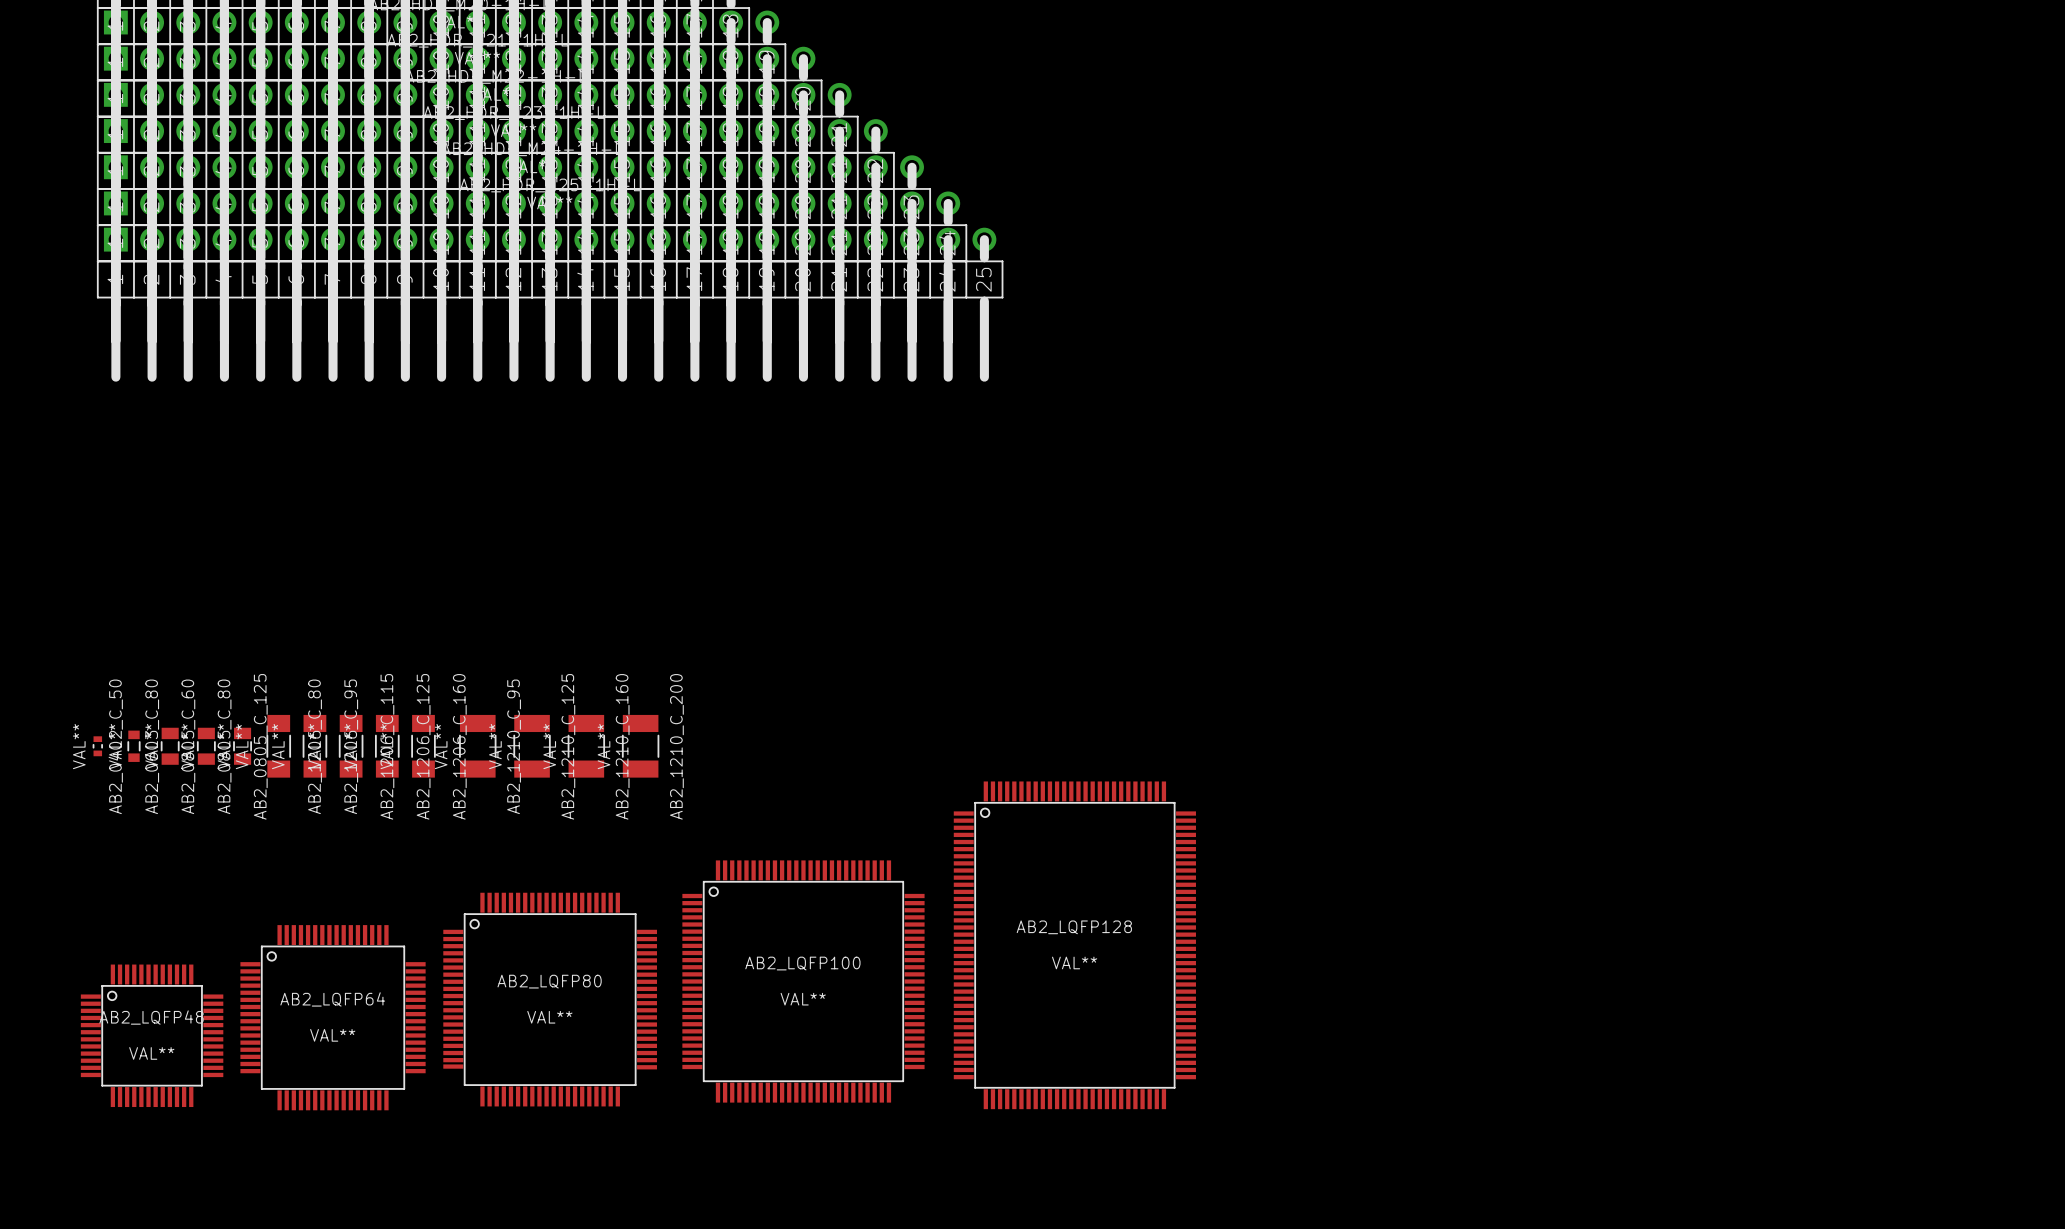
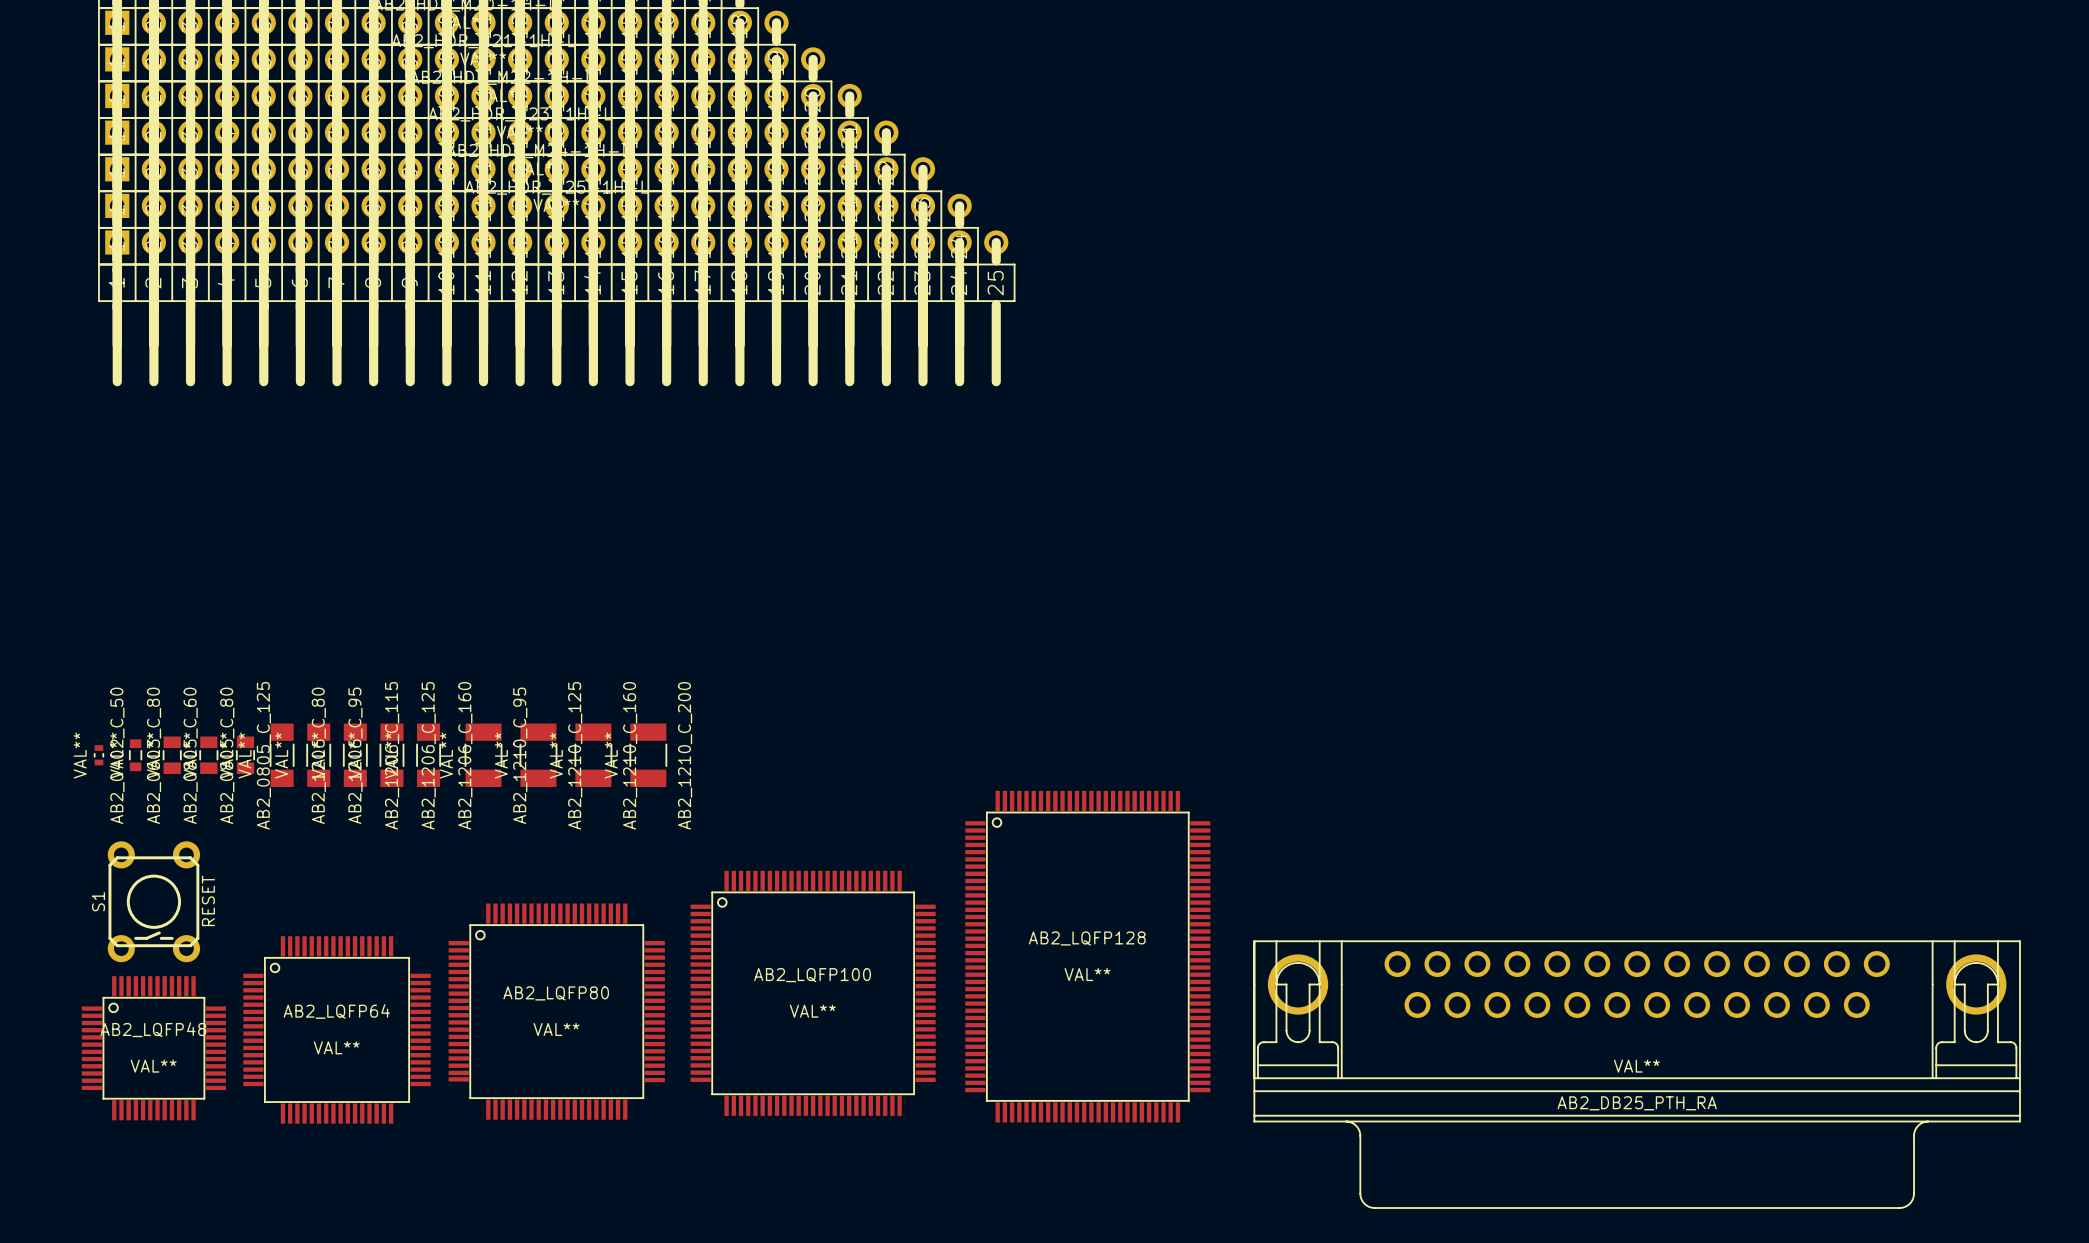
S1: none -> RESET (153, 901)
AB2_DB25_PTH_RA: none -> VAL** (1637, 1074)

